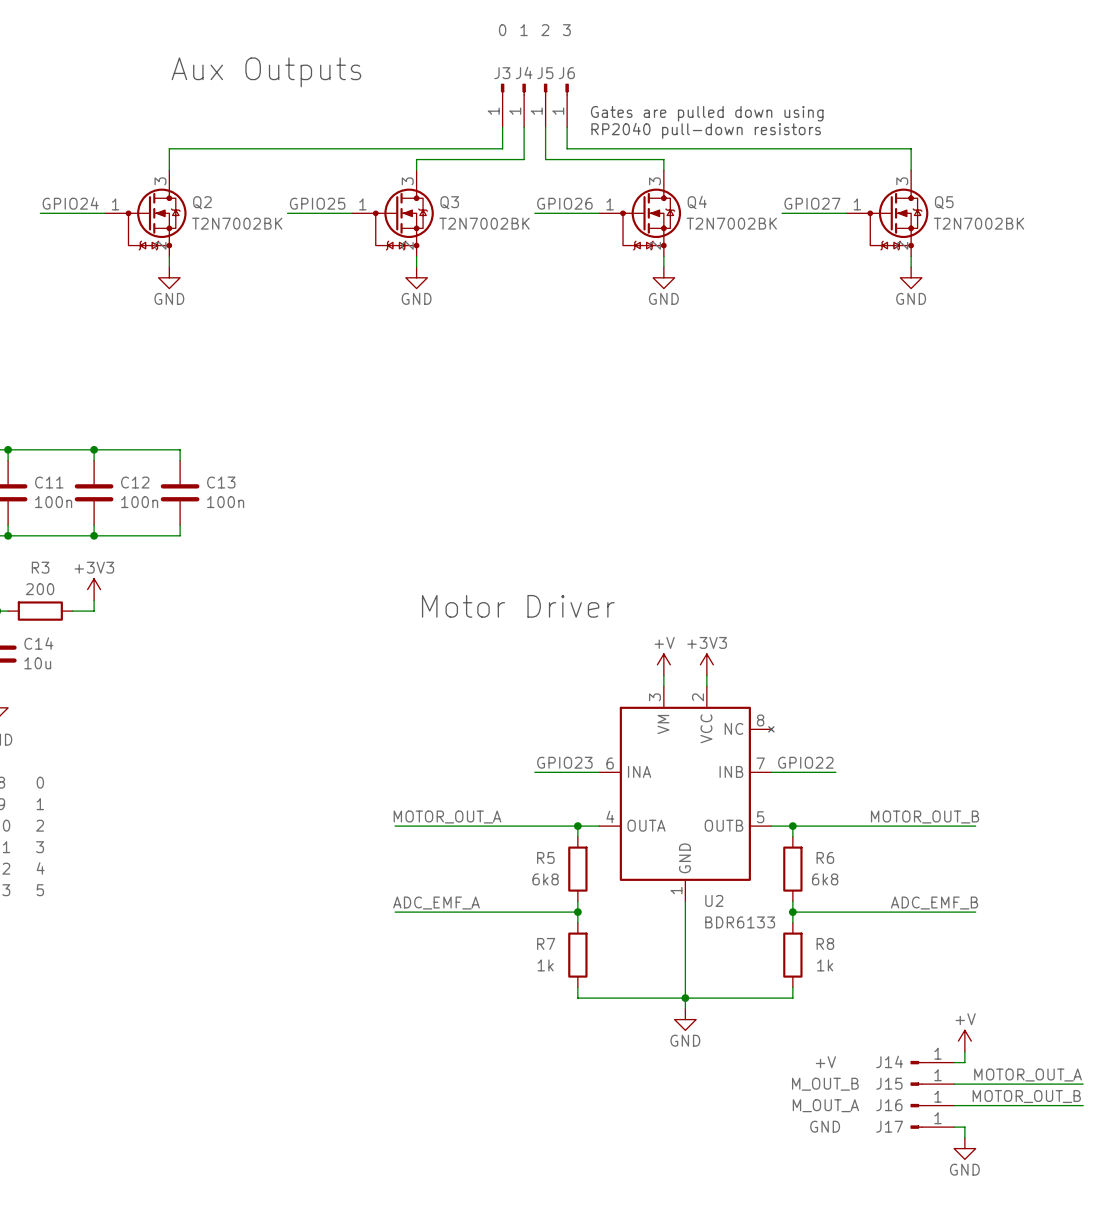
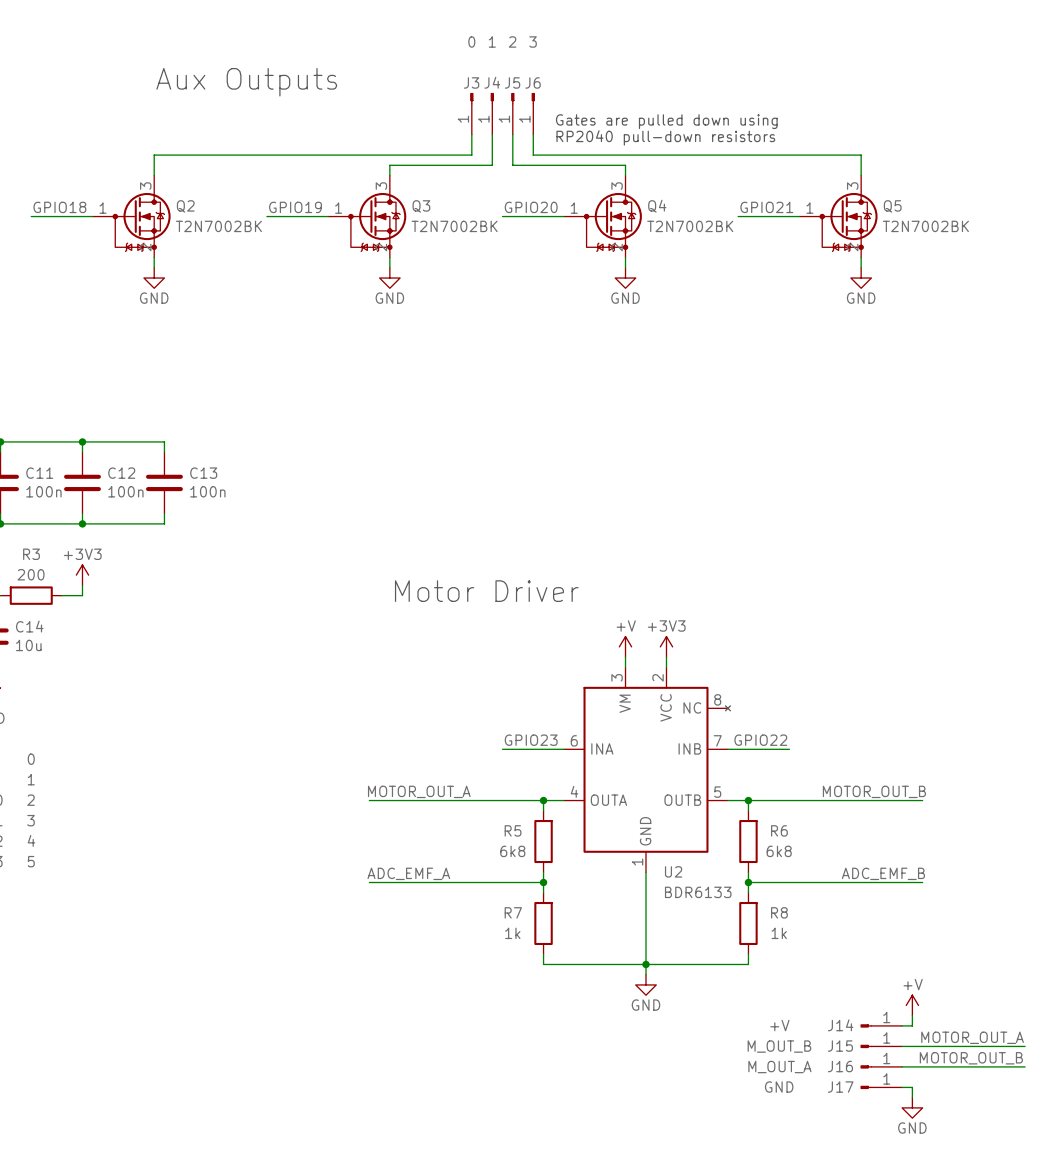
label: GPIO24 (70, 203) -> GPIO18 (59, 207)
label: GPIO25 (317, 203) -> GPIO19 (295, 207)
label: GPIO26 (564, 203) -> GPIO20 (531, 207)
label: GPIO27 (812, 203) -> GPIO21 (766, 207)

